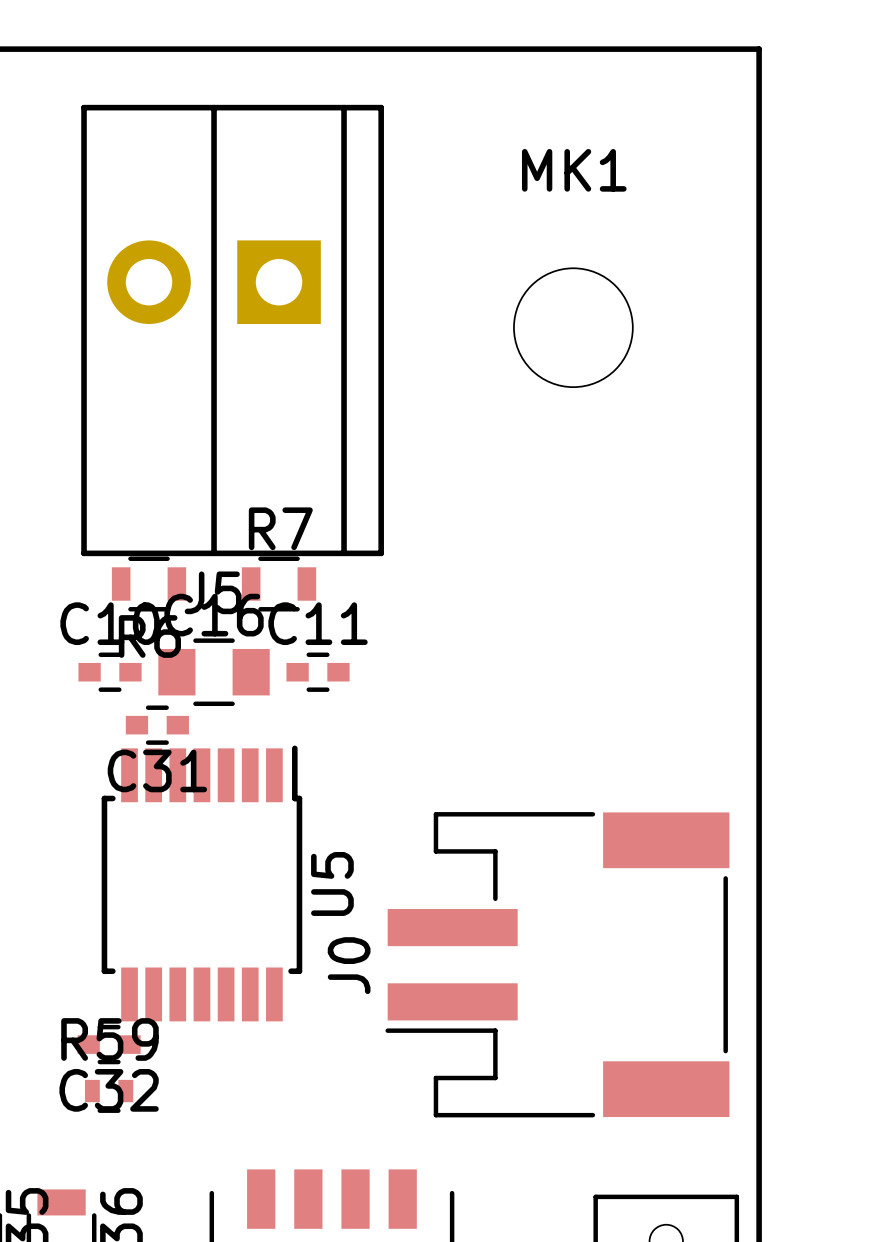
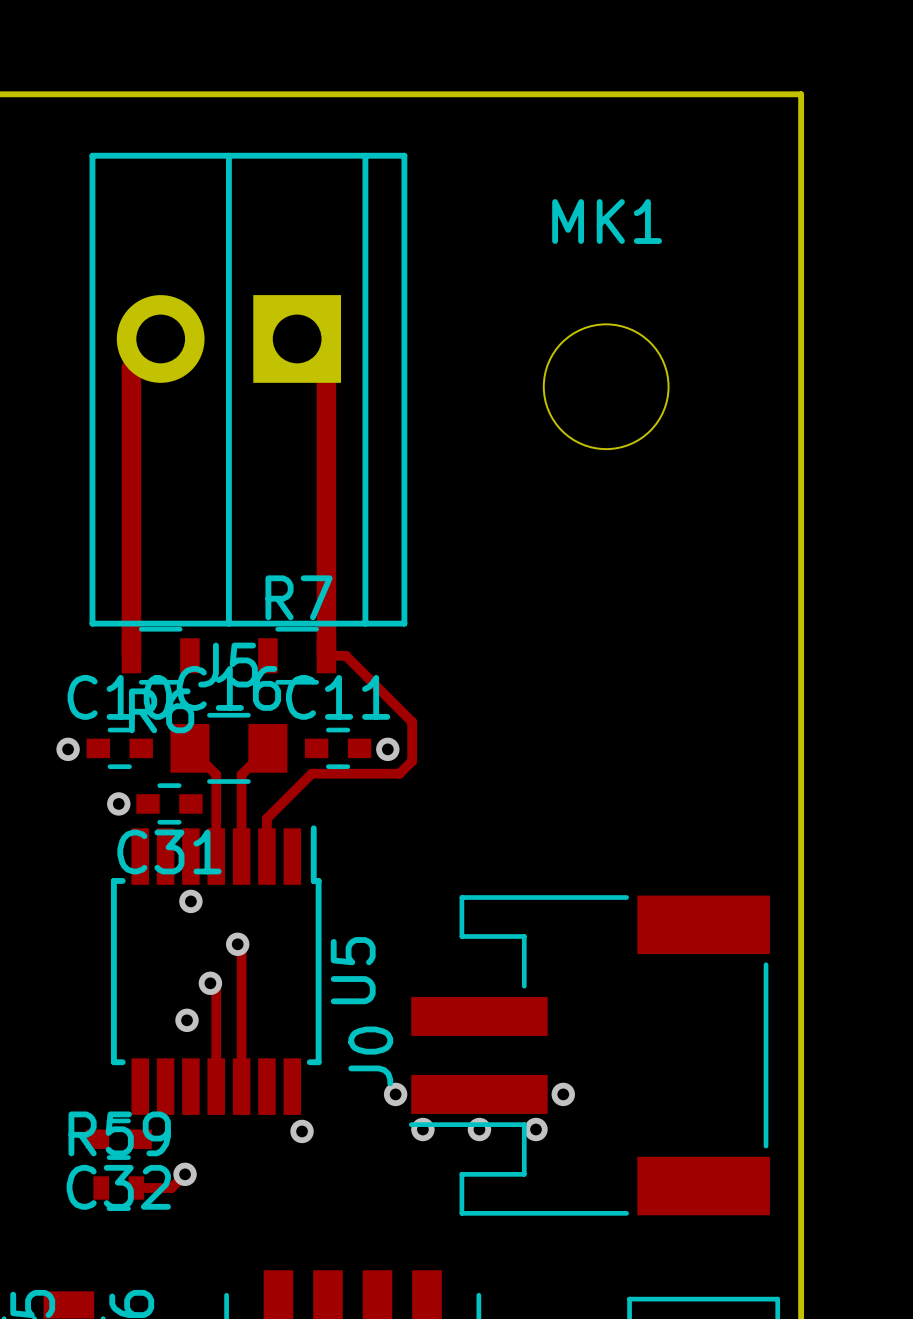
track: none -> (160, 338) (131, 368) (131, 655)
track: none -> (297, 338) (326, 368) (326, 655) (345, 655) (412, 722) (412, 761) (399, 773) (311, 773) (266, 818) (266, 856)
track: none -> (189, 748) (216, 774) (216, 856)
track: none -> (267, 748) (241, 774) (241, 856)
via: none -> (68, 749)
via: none -> (387, 749)
via: none -> (118, 803)
via: none -> (190, 901)
track: none -> (237, 944) (241, 948) (241, 1086)
via: none -> (237, 944)
track: none -> (210, 983) (216, 989) (216, 1086)
via: none -> (210, 983)
via: none -> (187, 1020)
via: none -> (395, 1094)
via: none -> (563, 1094)
via: none -> (422, 1129)
via: none -> (479, 1129)
via: none -> (535, 1129)
via: none -> (302, 1131)
track: none -> (185, 1174) (171, 1187) (136, 1187)
via: none -> (185, 1174)

